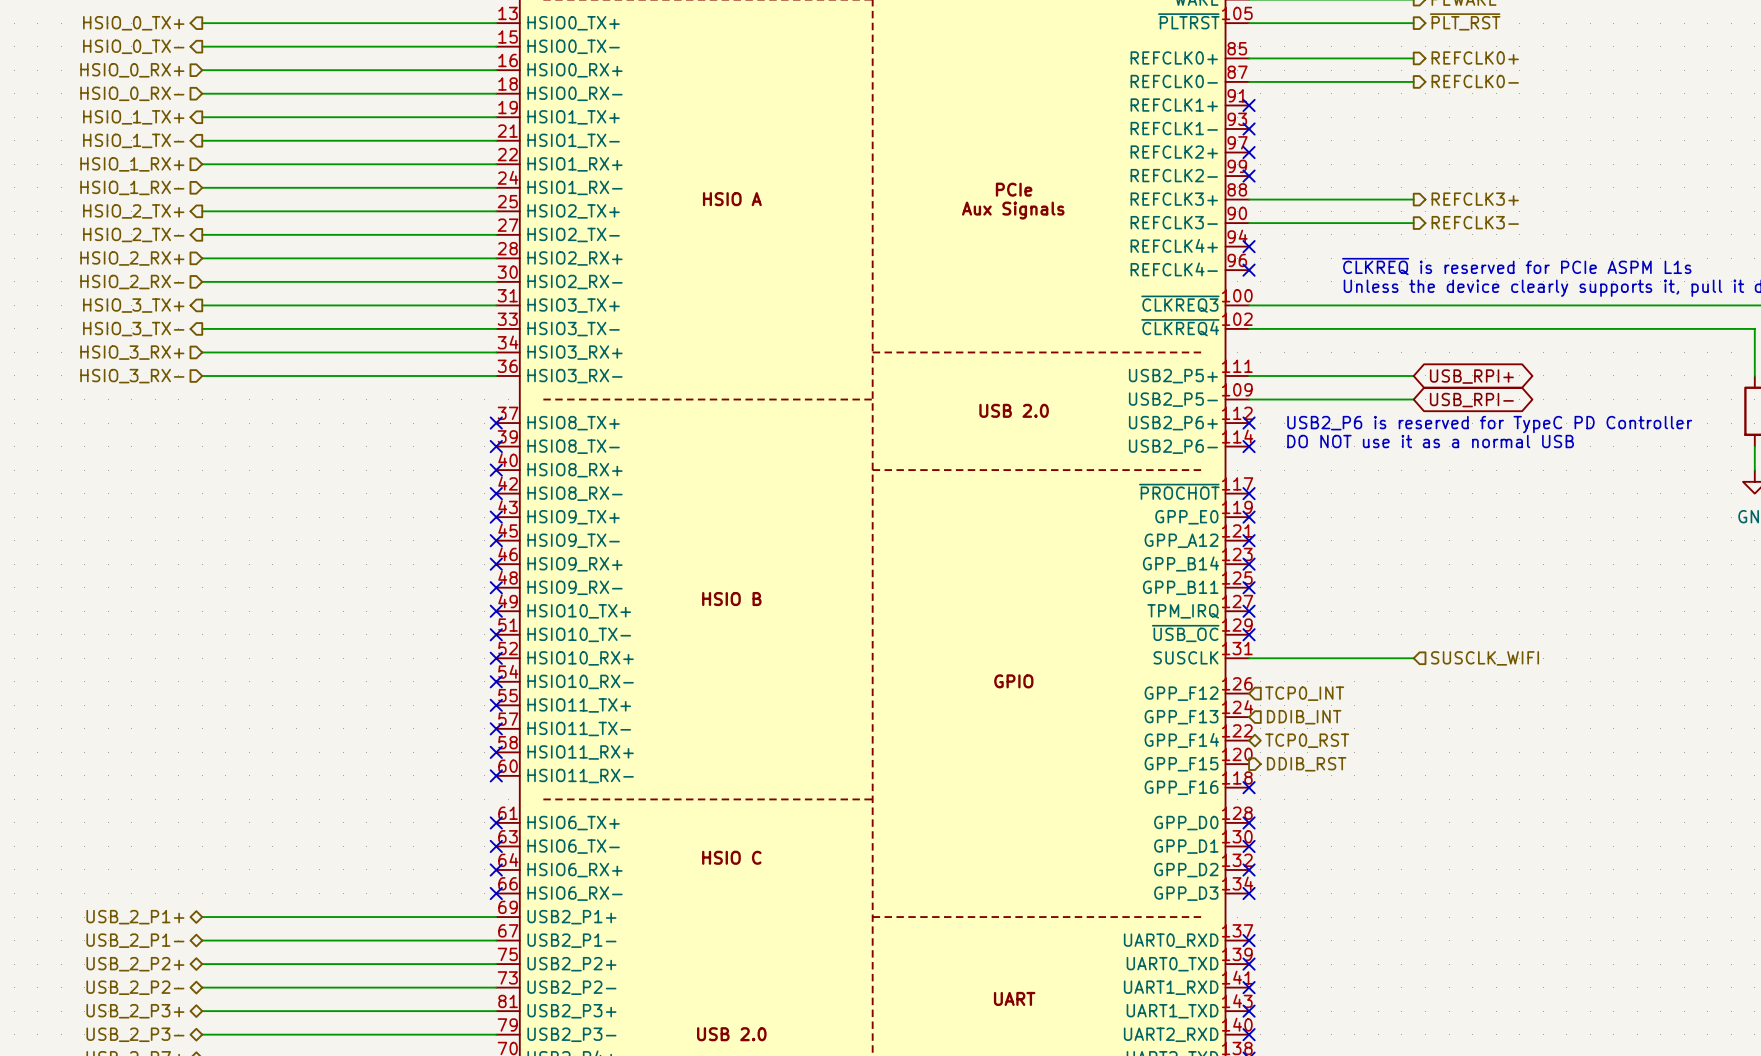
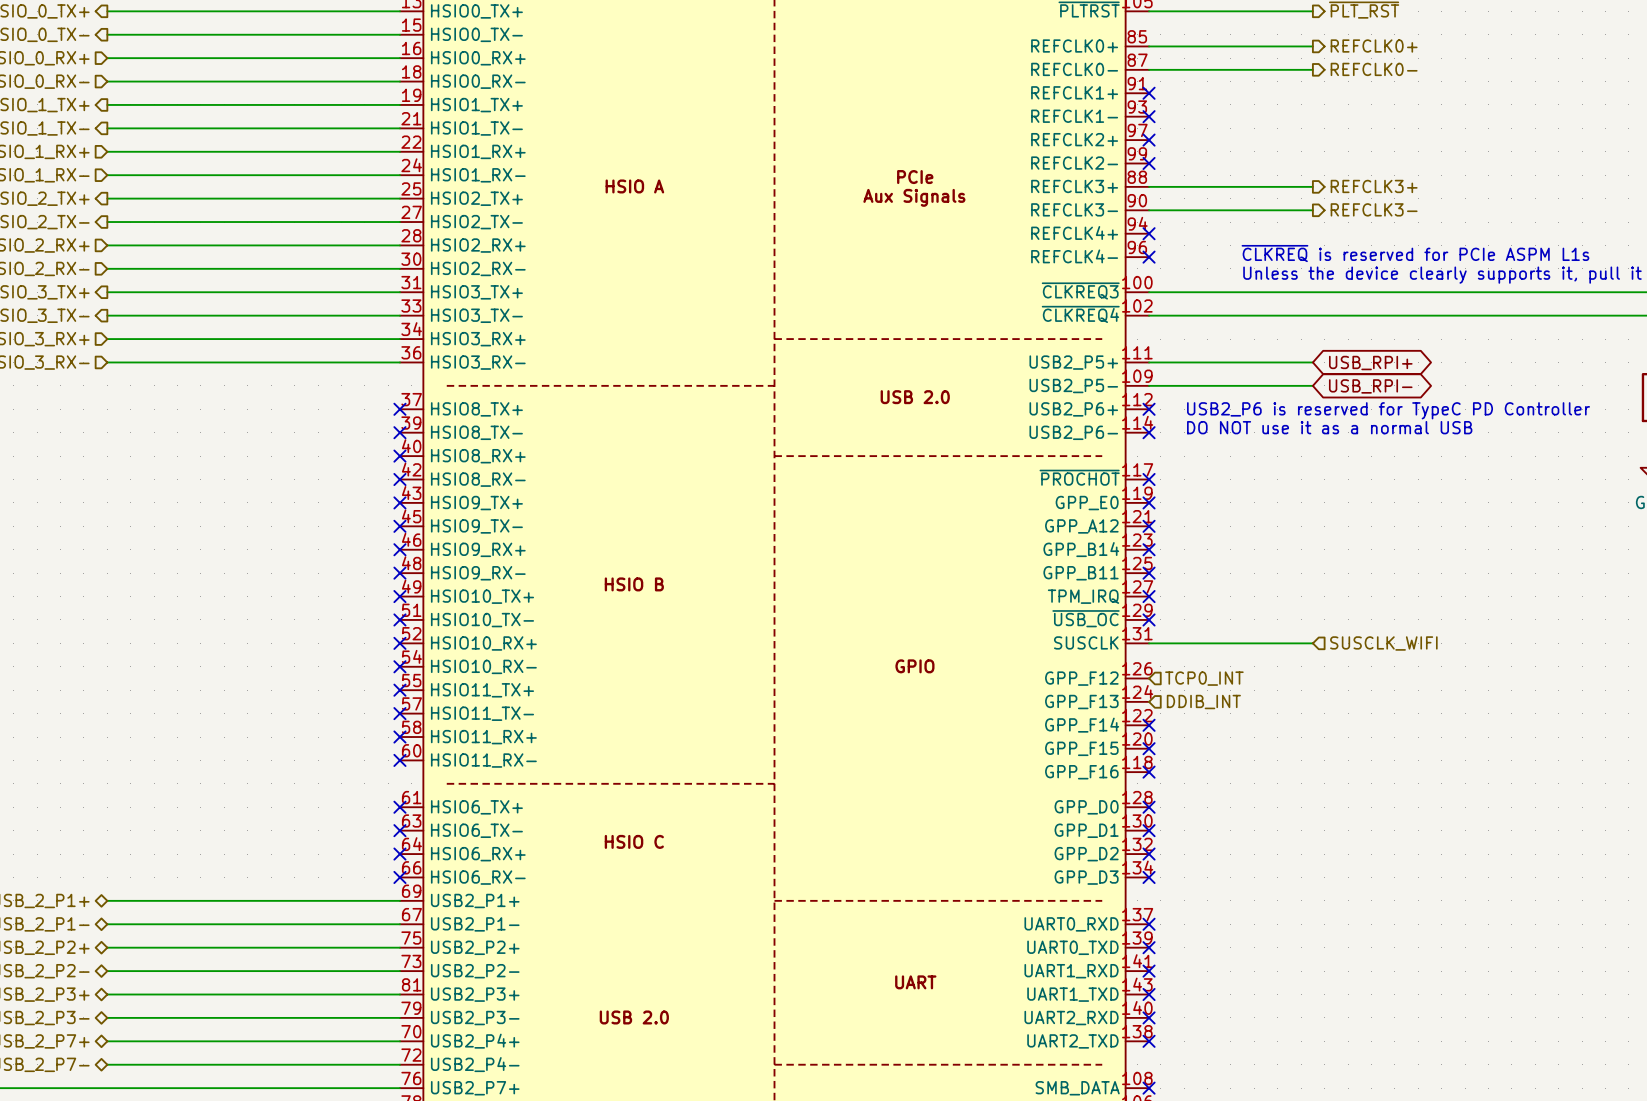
no-connect mark: none -> (1149, 725)
hierarchical label: TCP0_RST (1307, 740) -> none
no-connect mark: none -> (1149, 748)
hierarchical label: DDIB_RST (1306, 764) -> none

